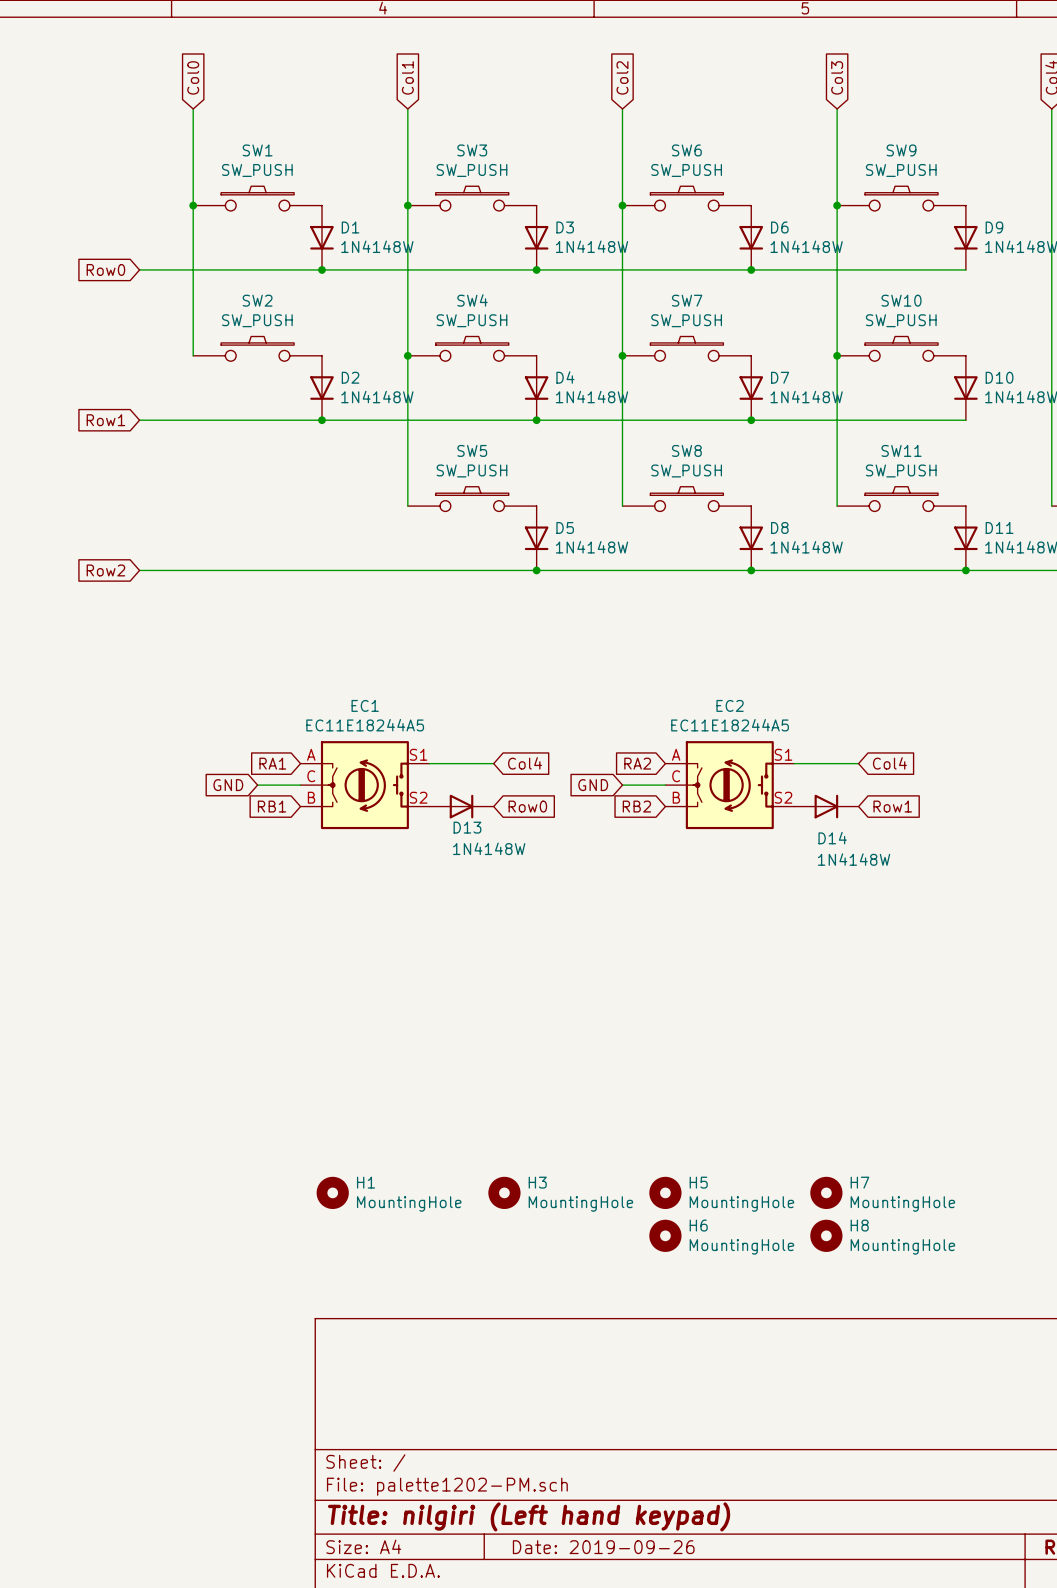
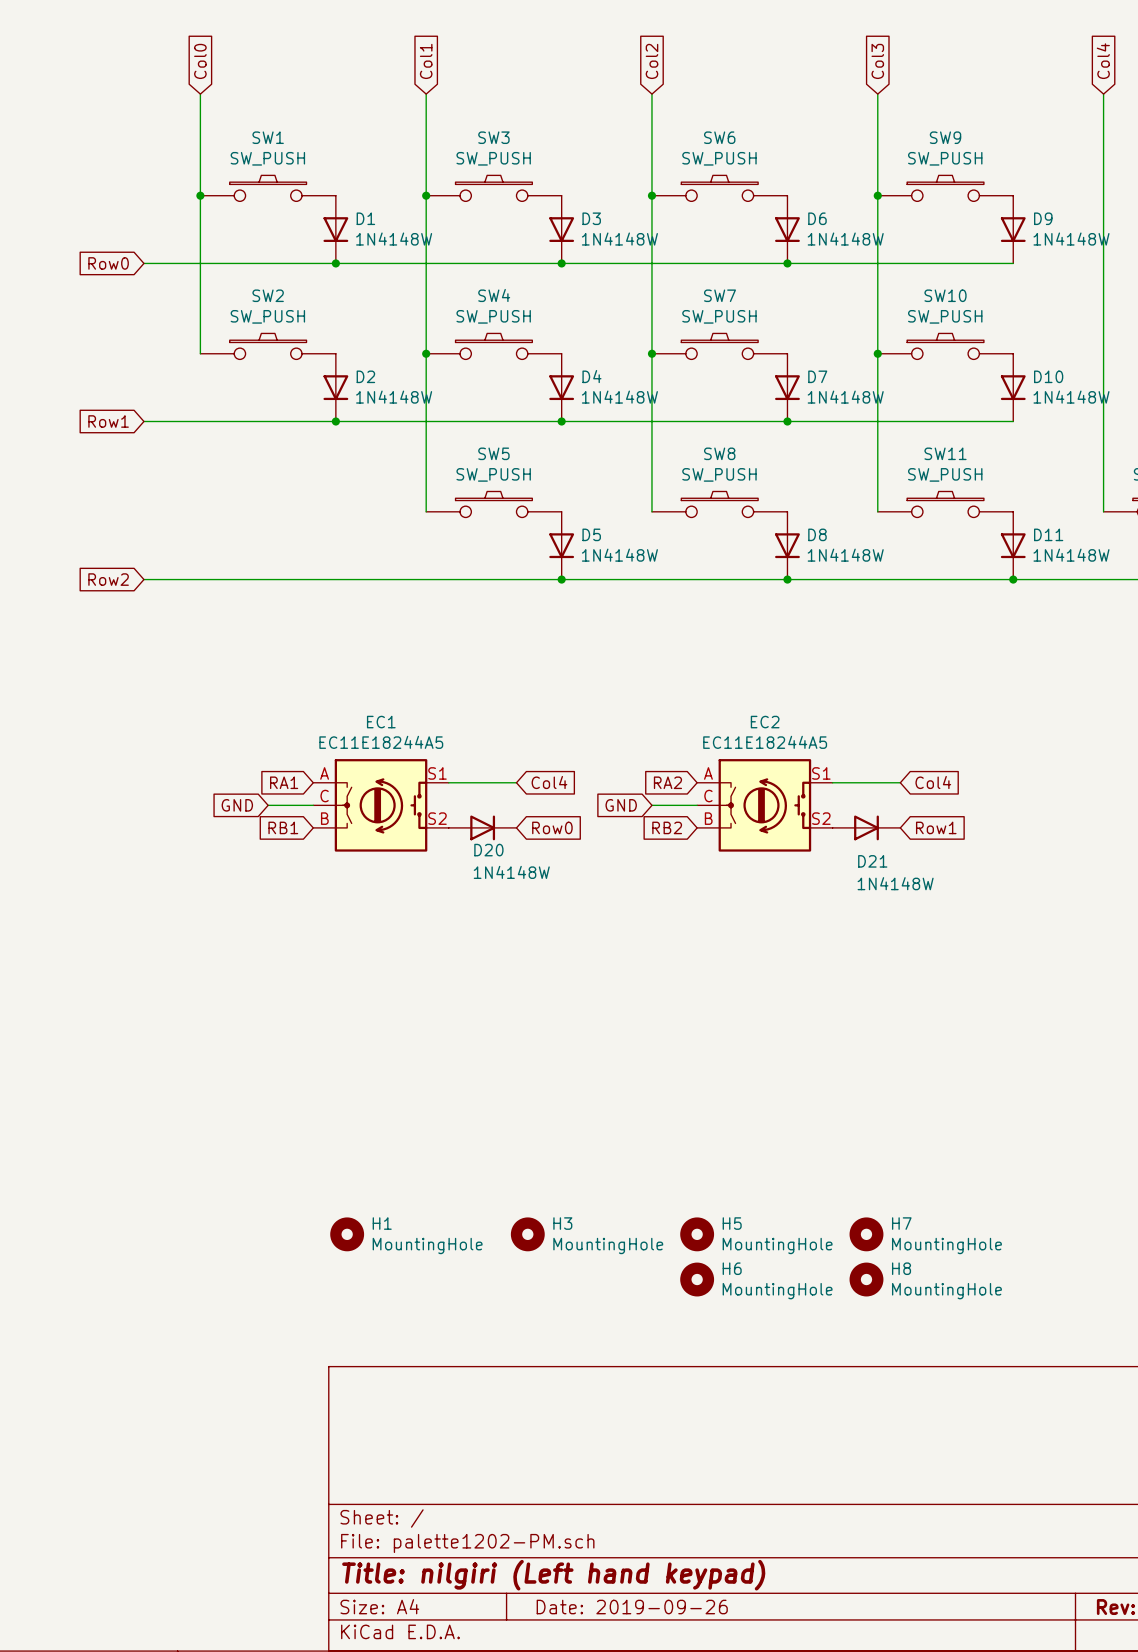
D13 name: D13 (467, 827) -> D20 (488, 850)
D14 name: D14 (832, 838) -> D21 (872, 861)

